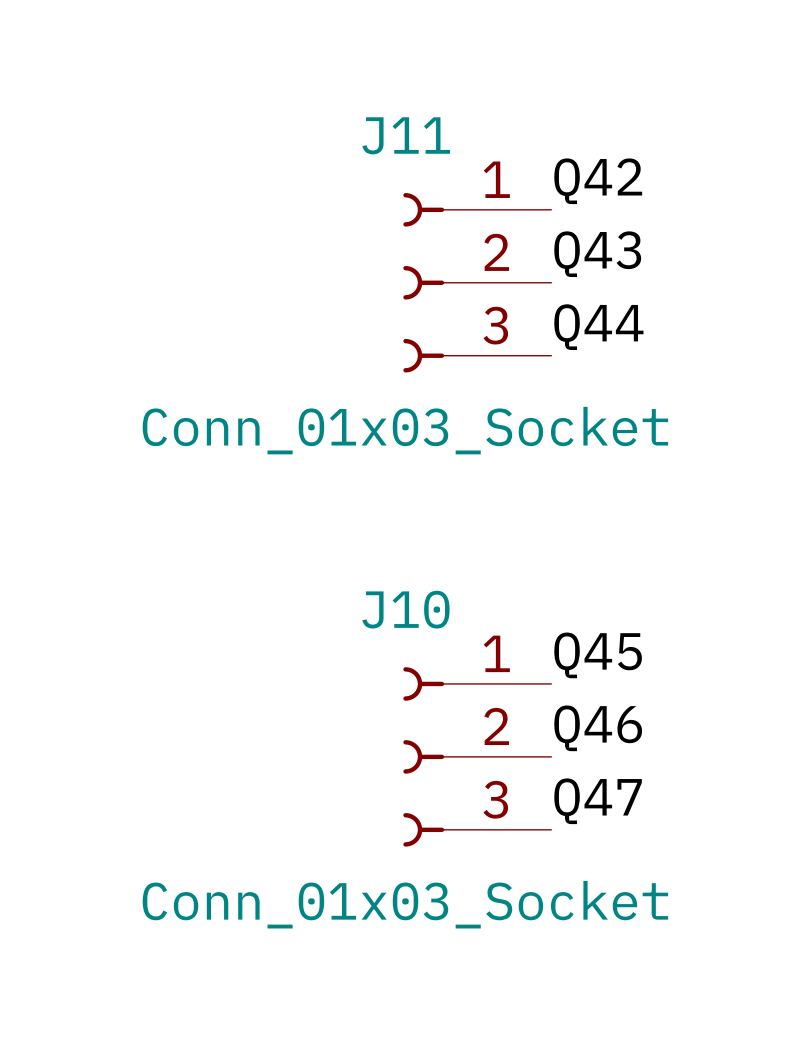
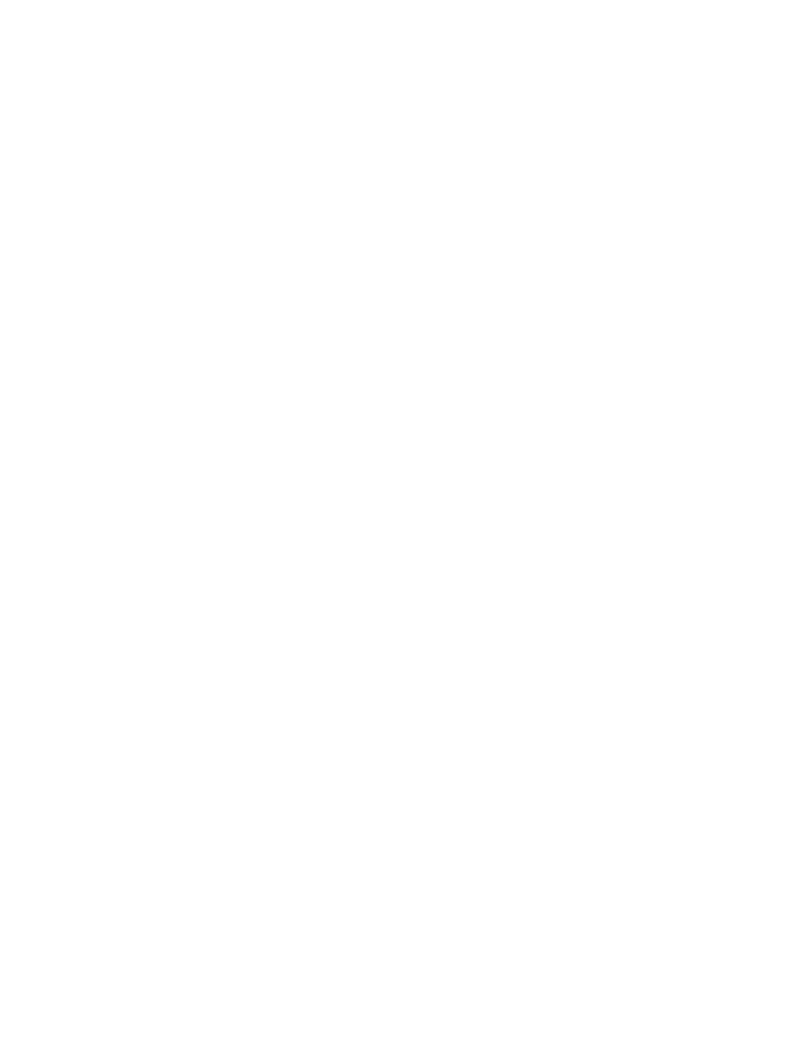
label: Q42 (598, 181) -> none
label: Q43 (597, 254) -> none
J11: Conn_01x03_Socket (477, 282) -> none
label: Q44 (598, 327) -> none
label: Q45 (598, 655) -> none
label: Q46 (598, 728) -> none
J10: Conn_01x03_Socket (477, 756) -> none
label: Q47 (598, 801) -> none

